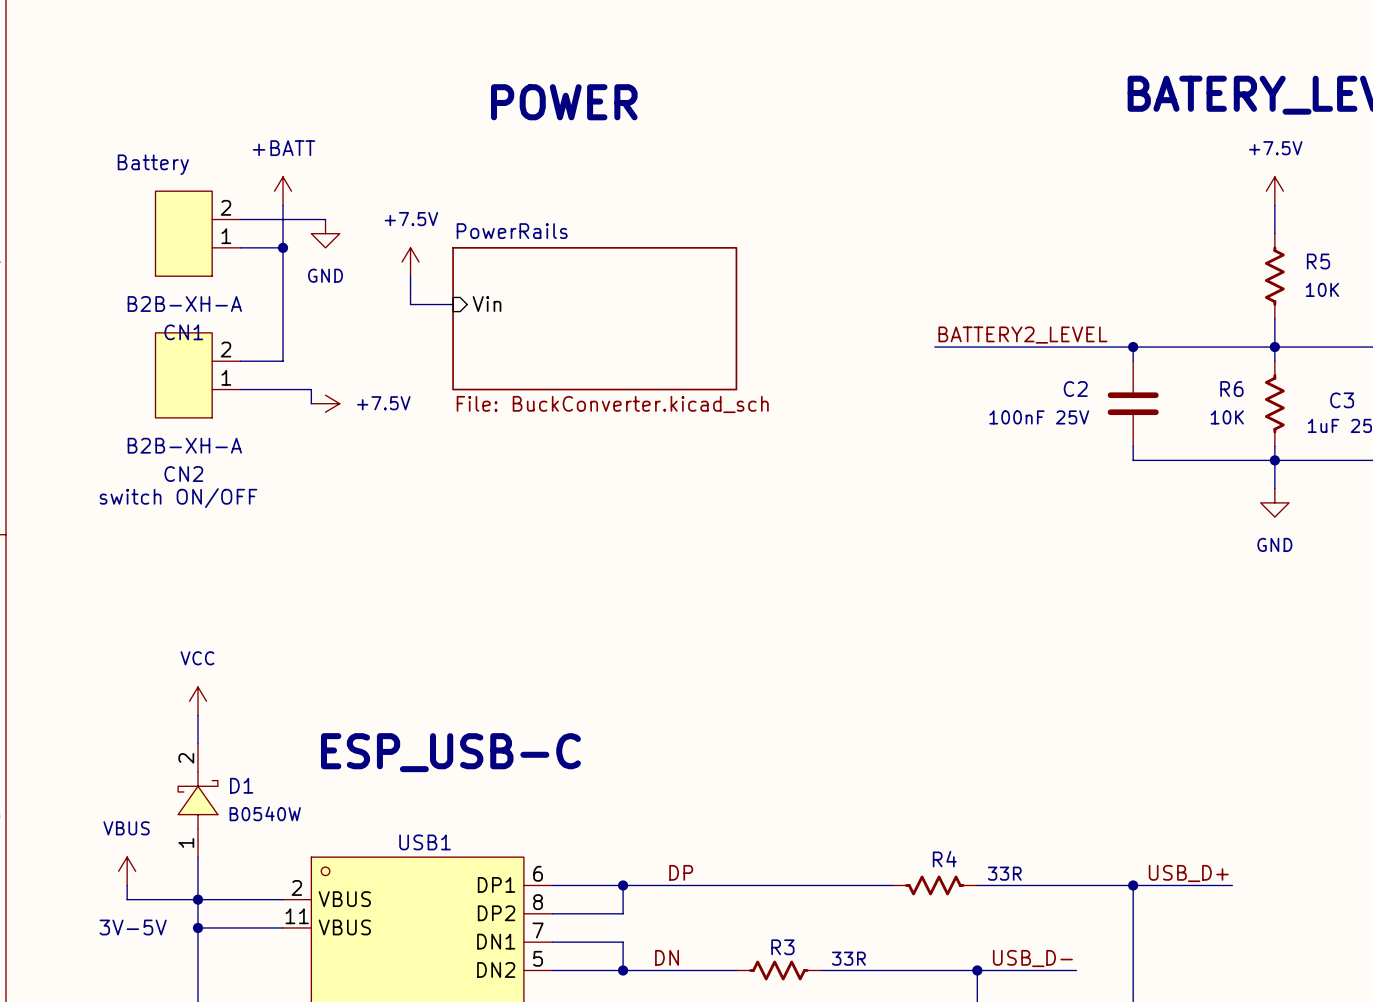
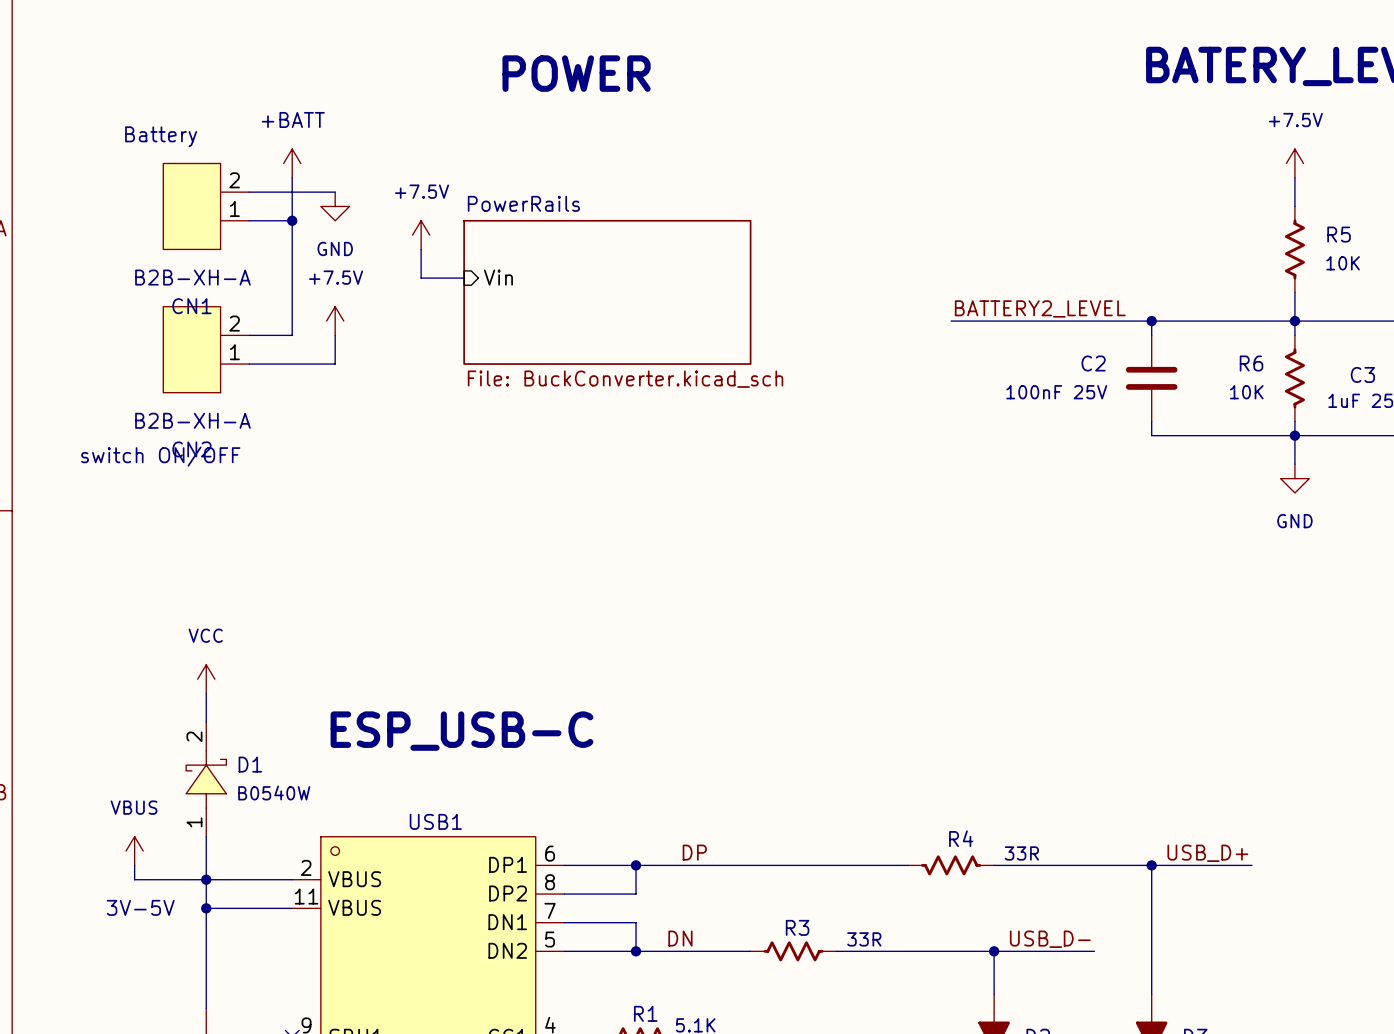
wire: (311, 389) (311, 403) -> (320, 364) (335, 364) (335, 335)
power symbol rotation: 0° (325, 403) -> 90° counterclockwise (335, 321)
power symbol position: +7.5V (325, 403) -> +7.5V (335, 321)
text position: switch ON/OFF (178, 498) -> switch ON/OFF (160, 456)

